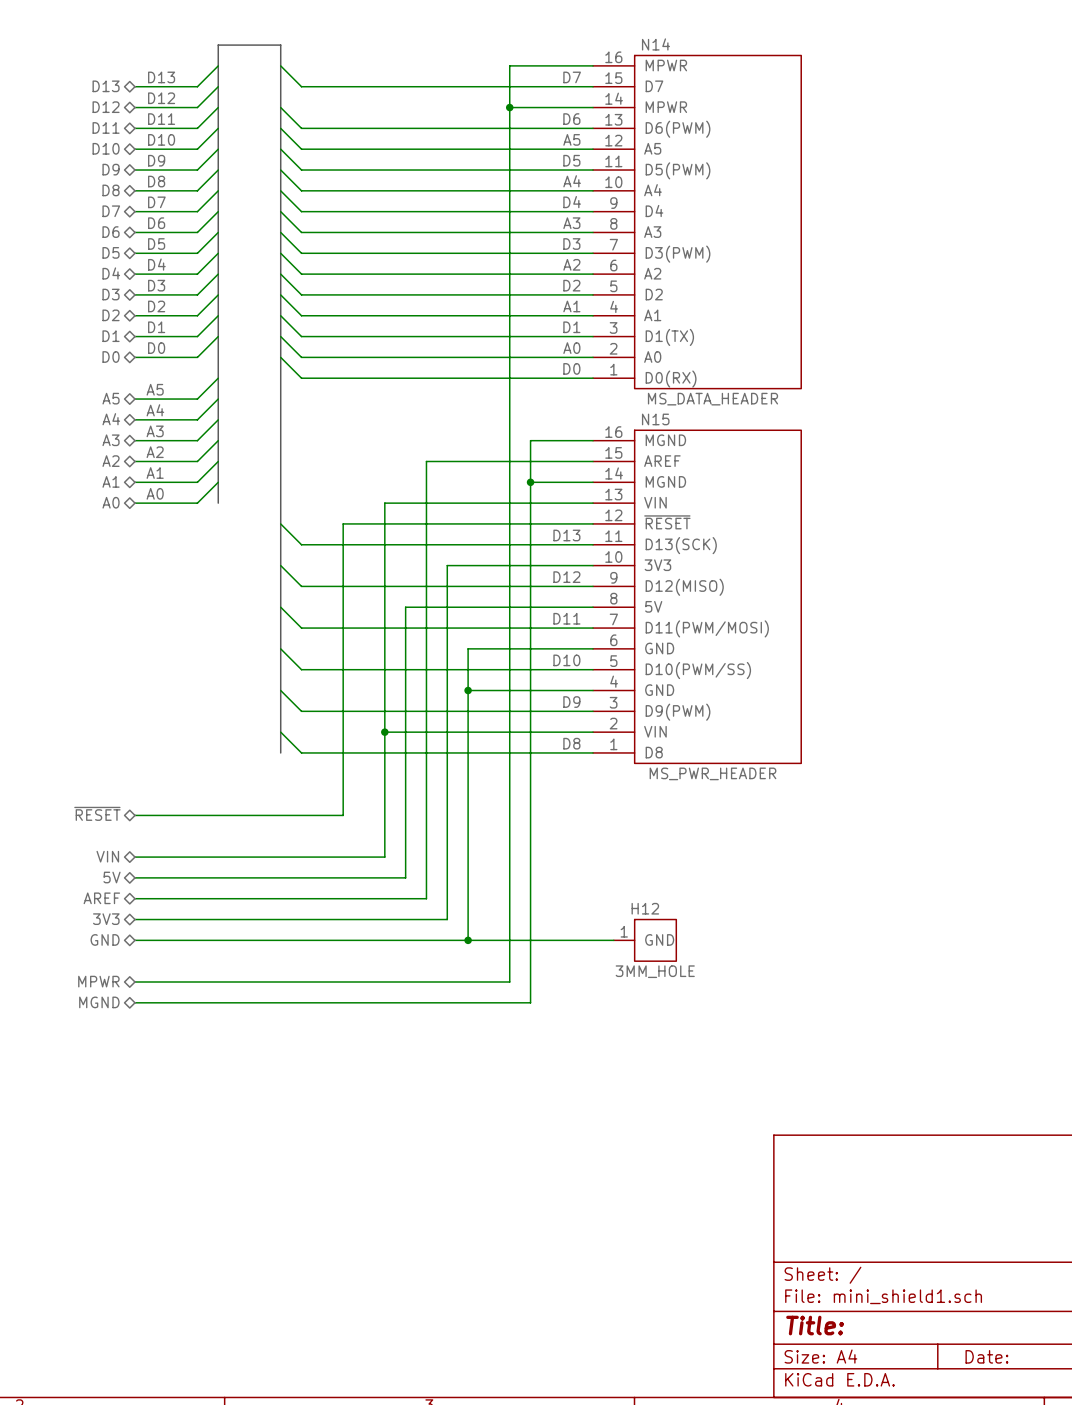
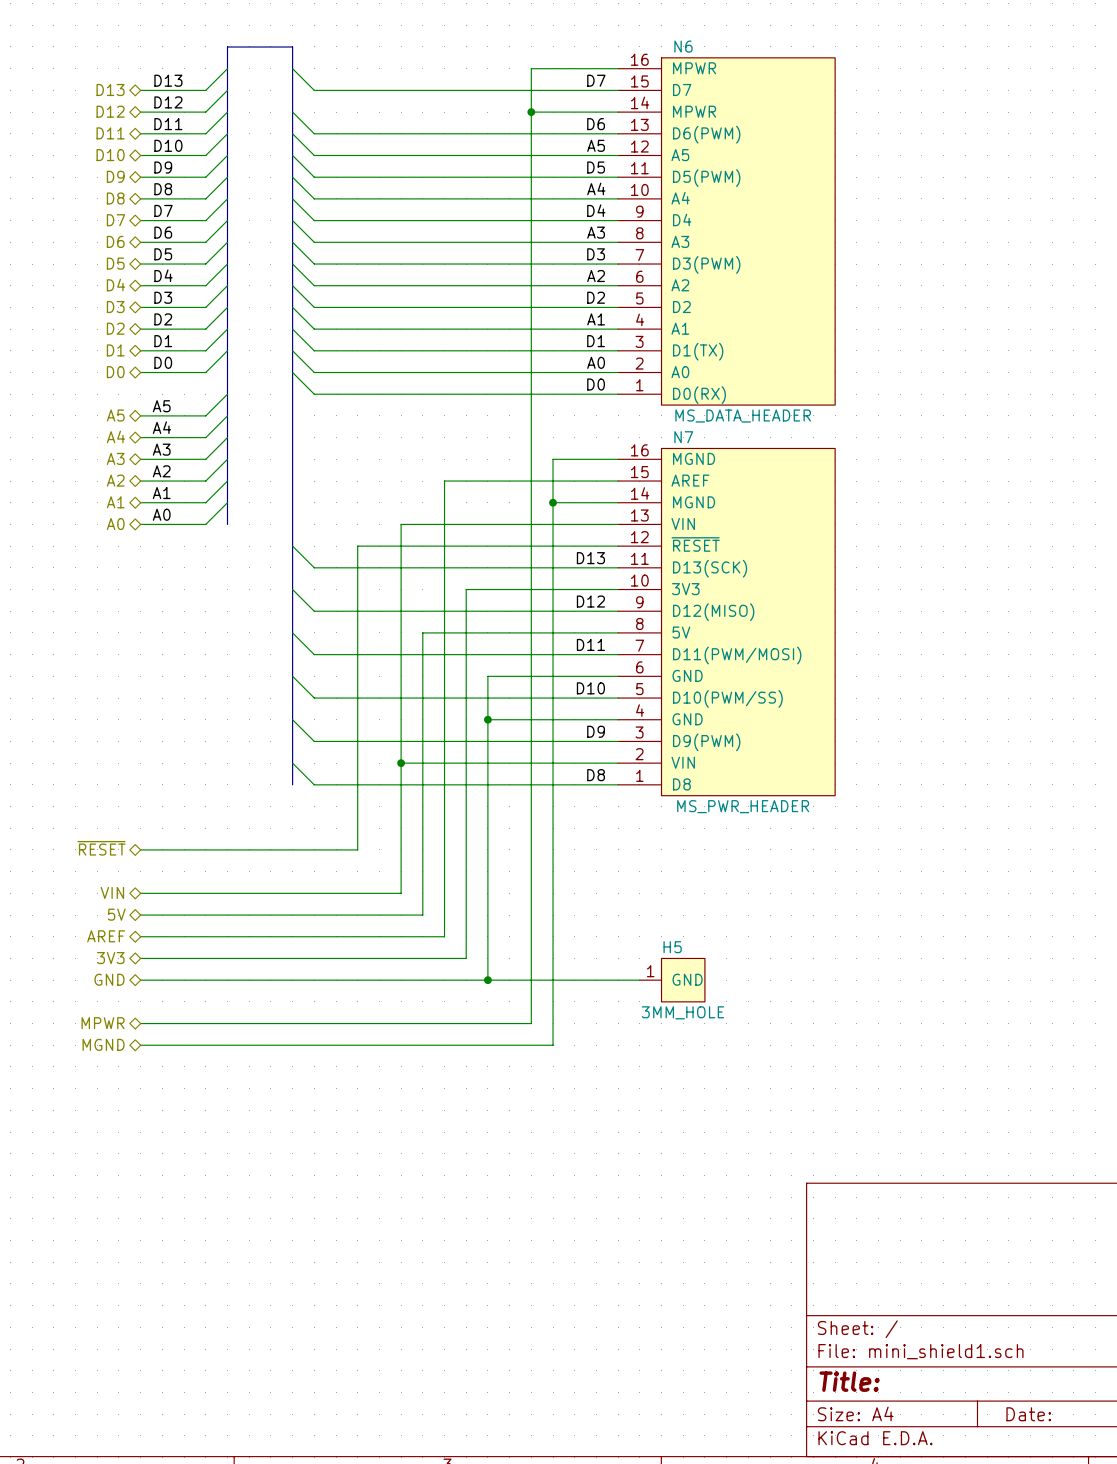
N14 name: N14 (655, 44) -> N6 (683, 46)
N15 name: N15 (655, 419) -> N7 (683, 437)
H12 name: H12 (645, 908) -> H5 (672, 947)

